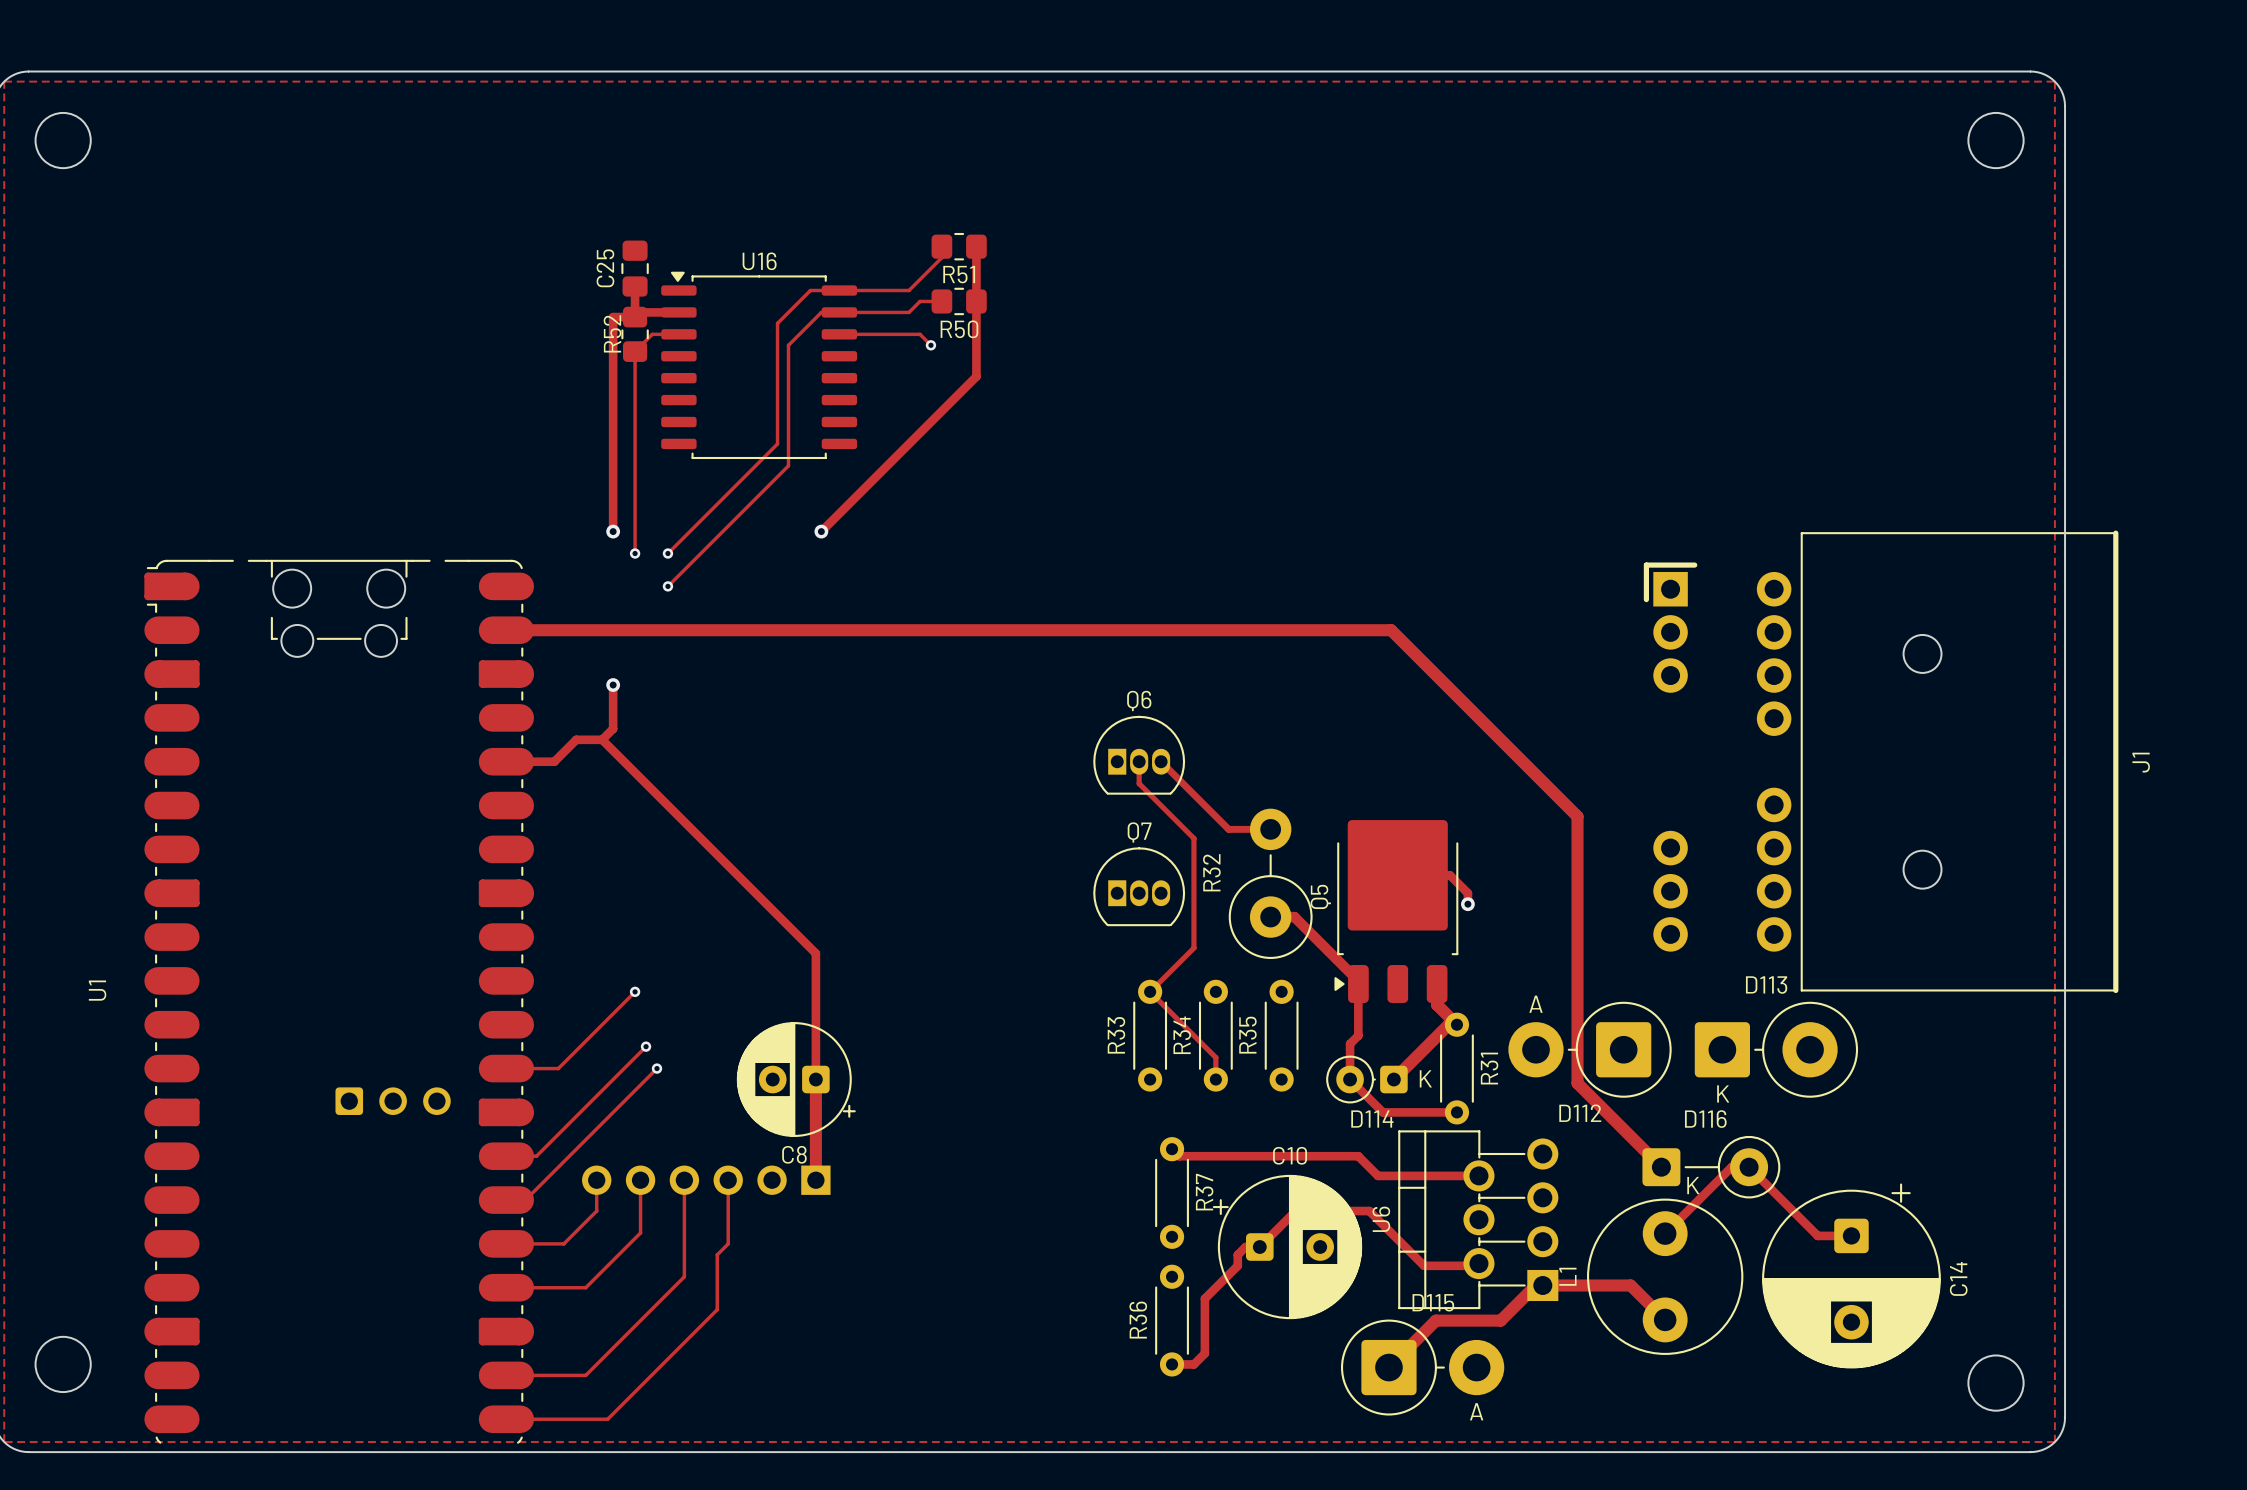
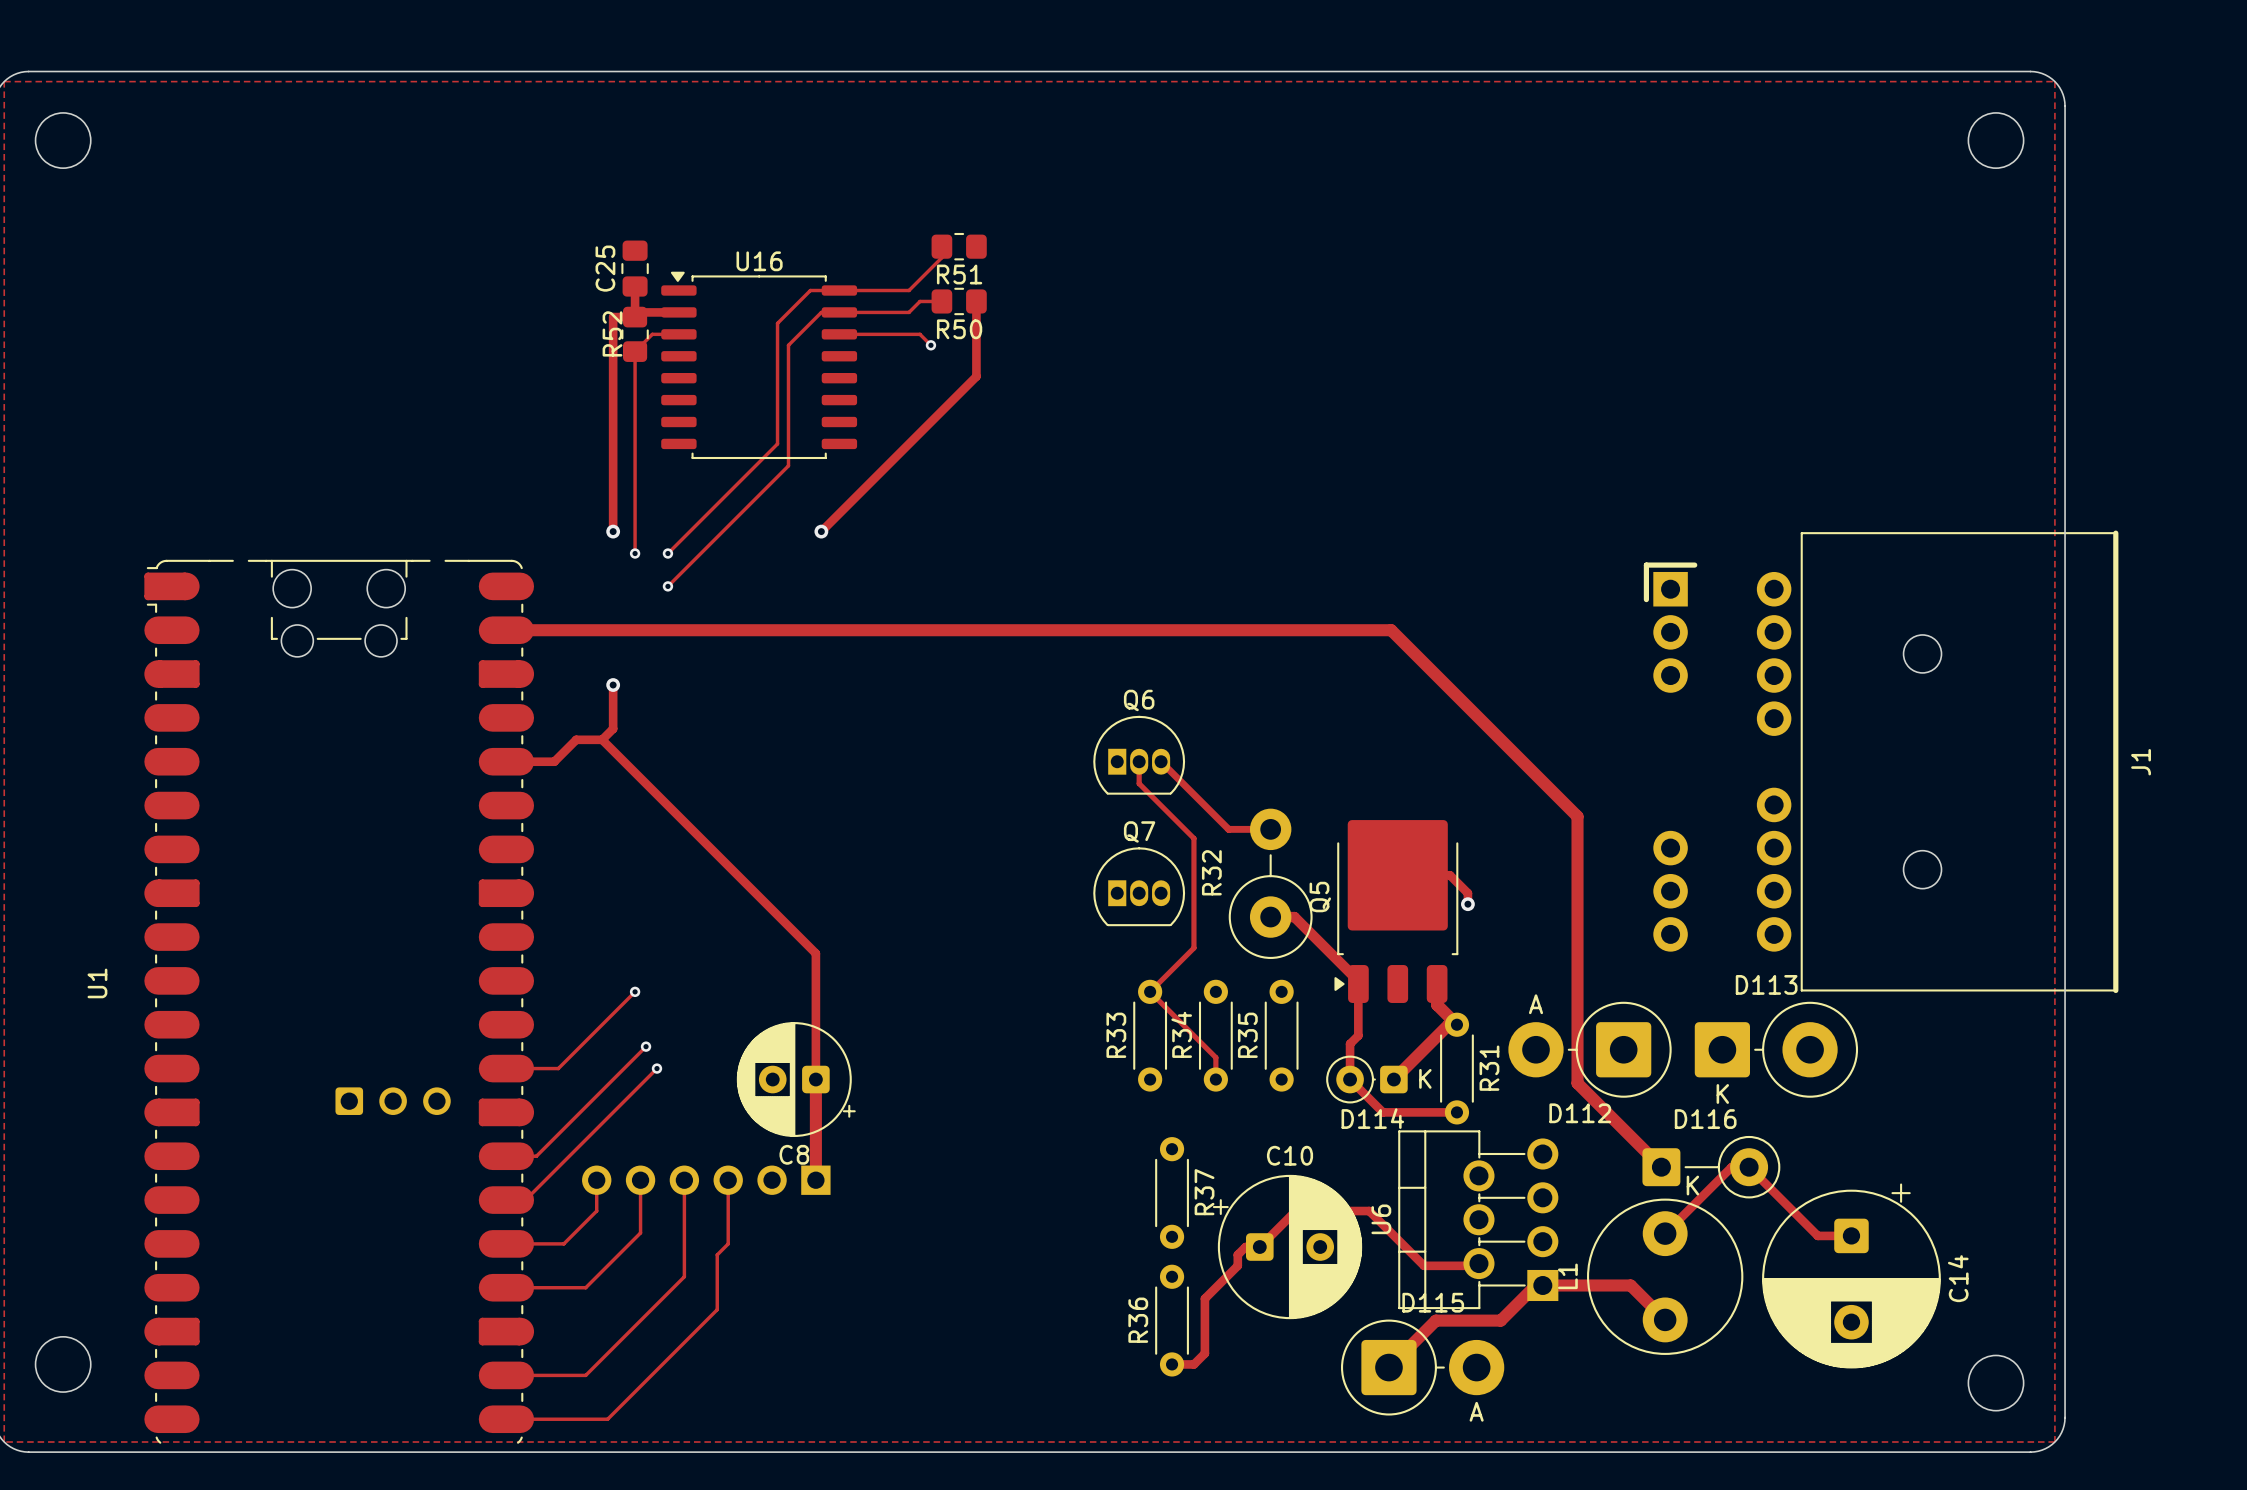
track: (976, 246) (976, 301) -> none
track: (1172, 1149) (1179, 1156) (1358, 1156) (1378, 1175) (1478, 1175) -> none

